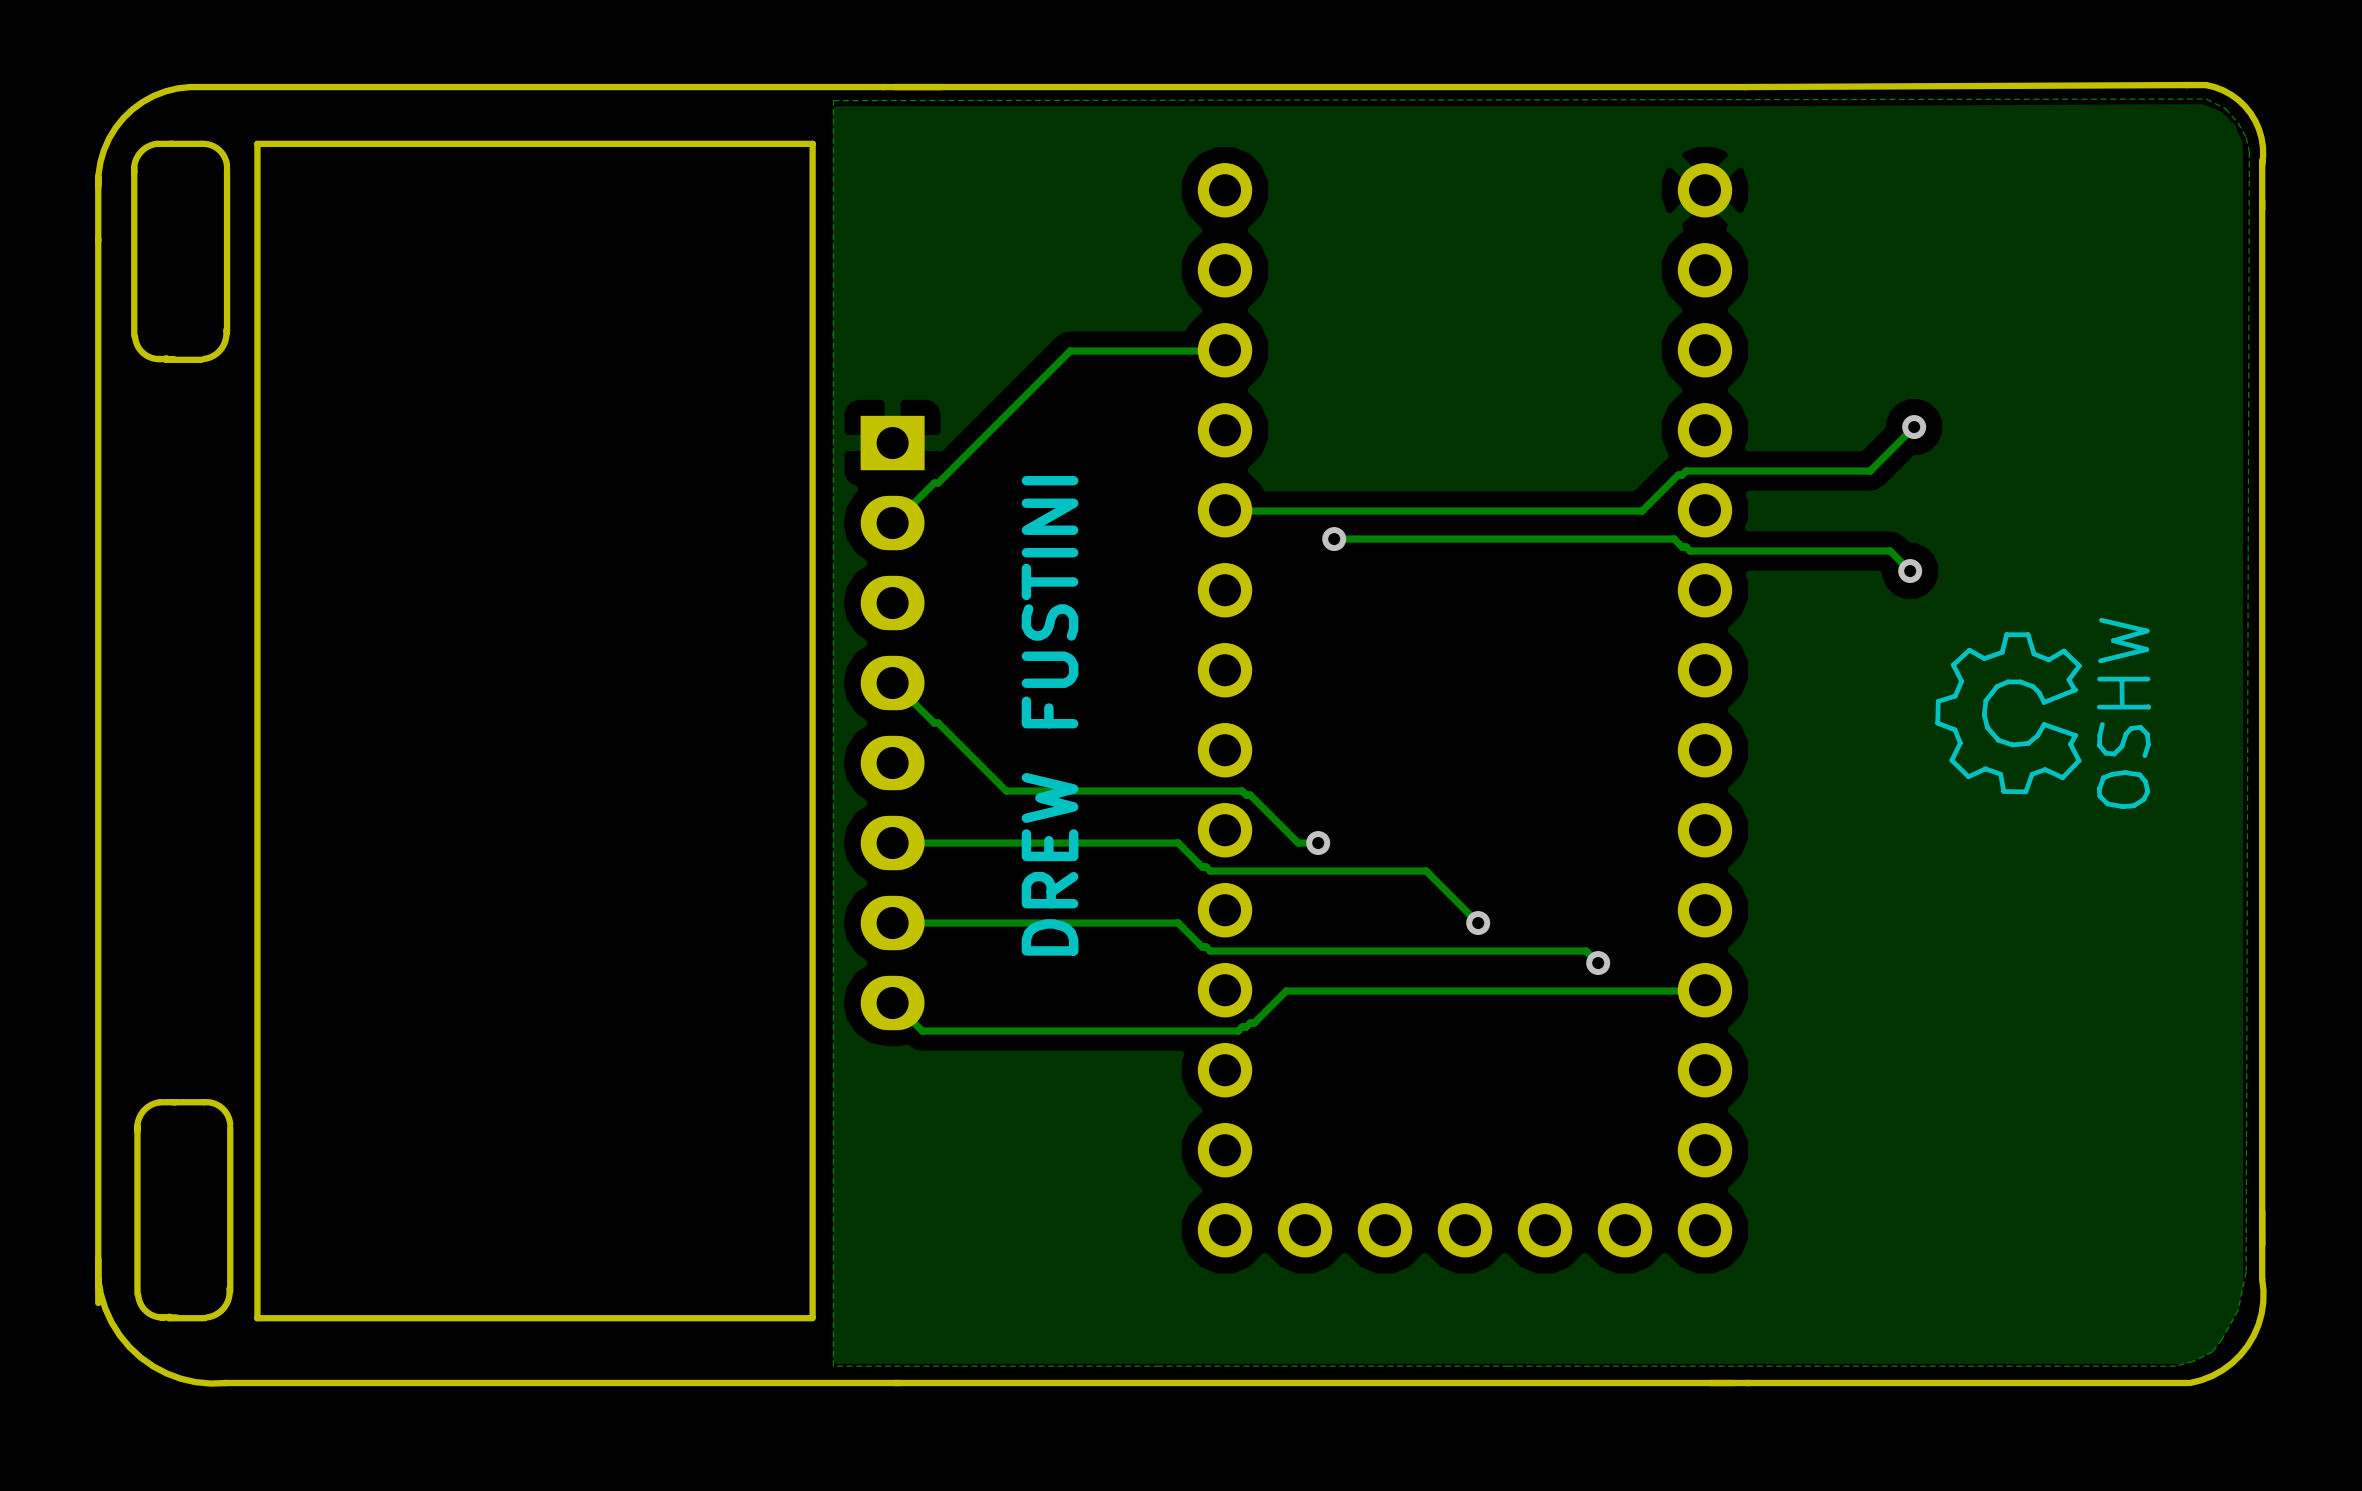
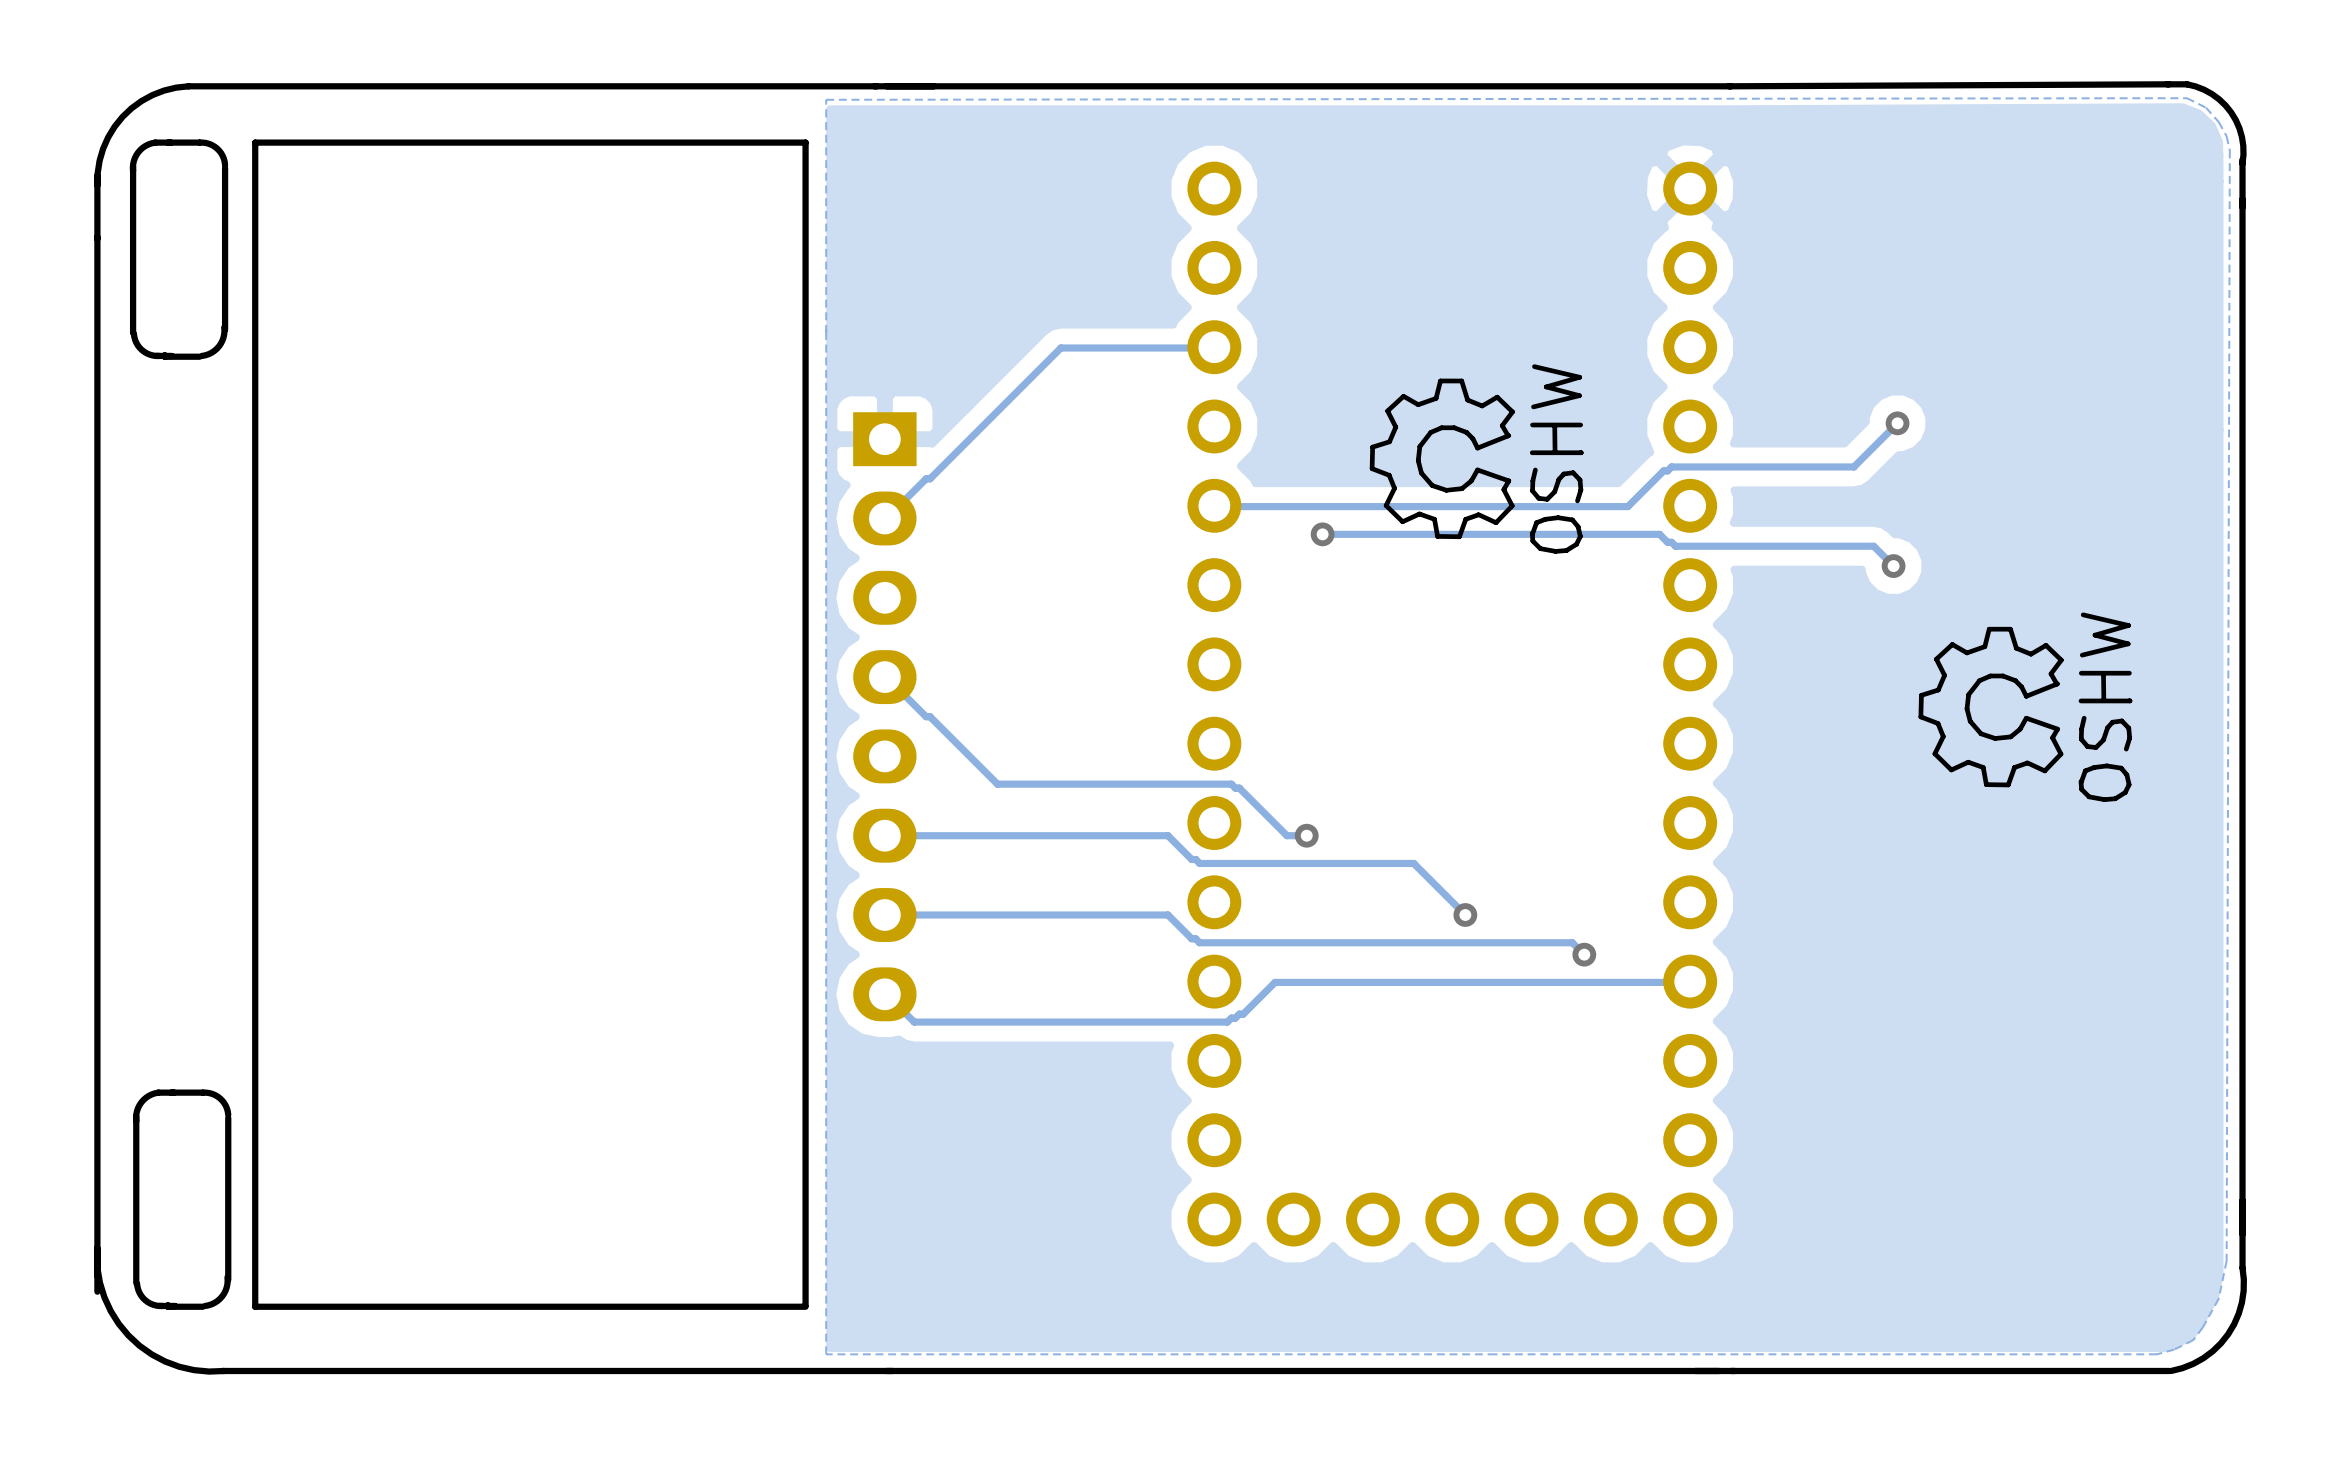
drawing: none -> [1369, 364, 1584, 554]
text: DREW FUSTINI (1050, 715) -> none

